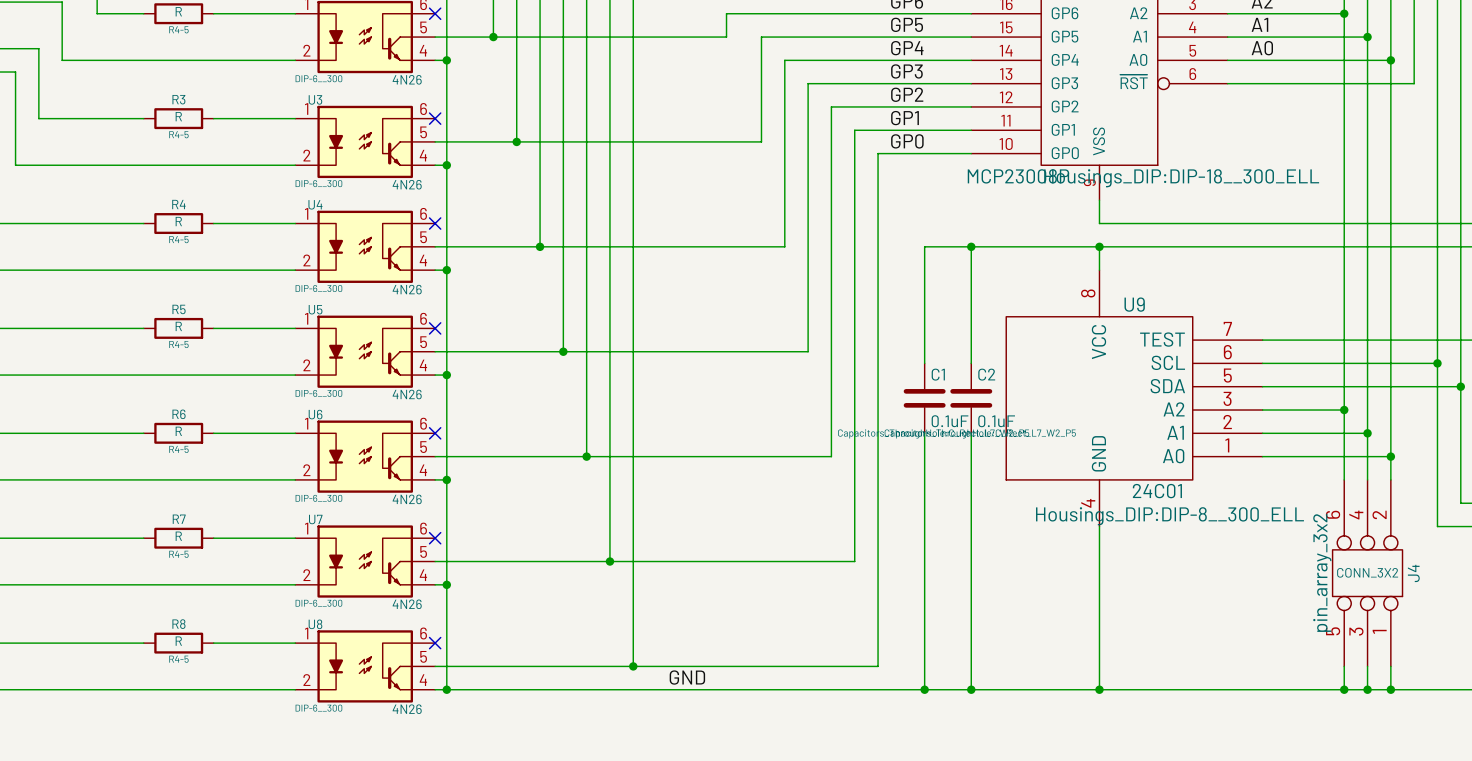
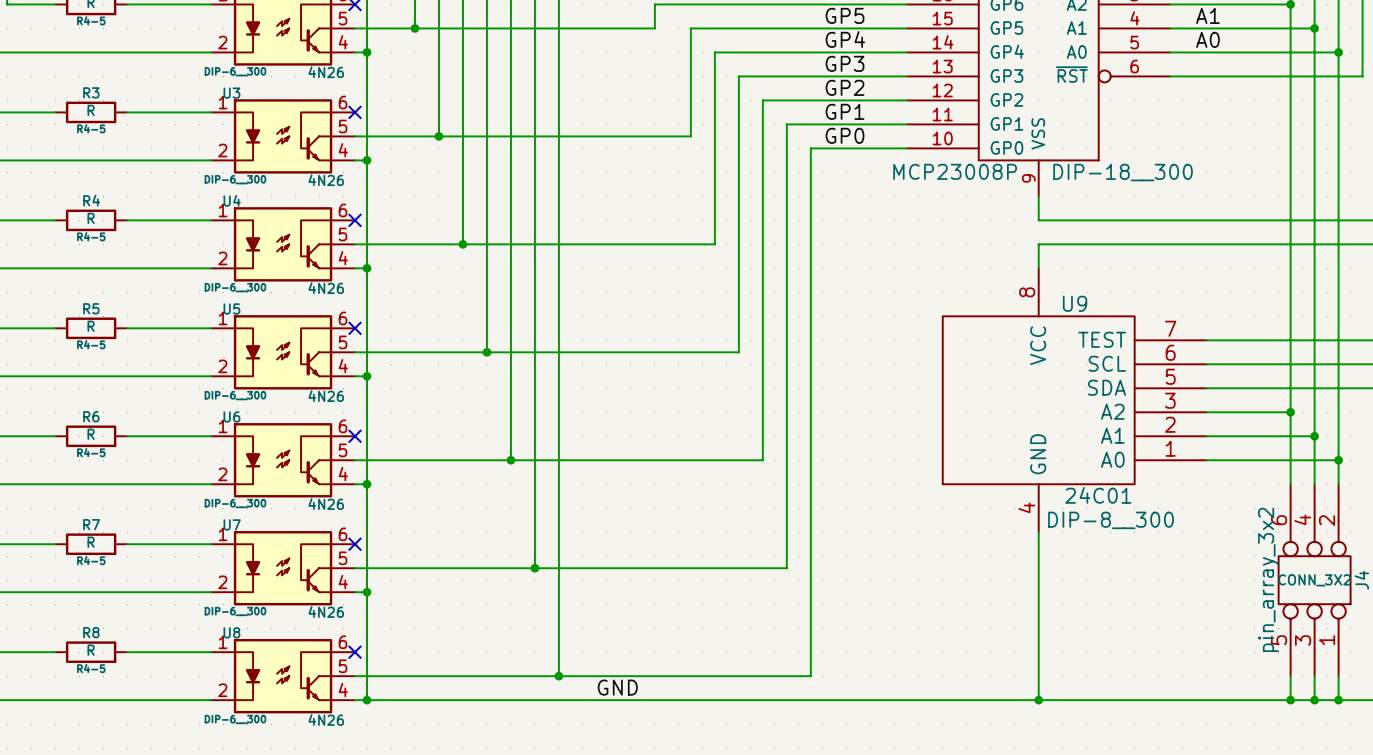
part text: Housings_DIP:DIP-18__300_ELL (1181, 178) -> DIP-18__300 (1123, 172)
wire: (971, 246) (971, 363) -> none
junction: (971, 246) -> none
wire: (1099, 246) (924, 246) (924, 363) -> none
junction: (1099, 246) -> none
C1: 0.1uF (924, 398) -> none
C2: 0.1uF (971, 398) -> none
wire: (924, 433) (924, 689) -> none
wire: (971, 433) (971, 689) -> none
U9 text: Housings_DIP:DIP-8__300_ELL (1169, 516) -> DIP-8__300 (1111, 520)
junction: (924, 689) -> none
junction: (971, 689) -> none

